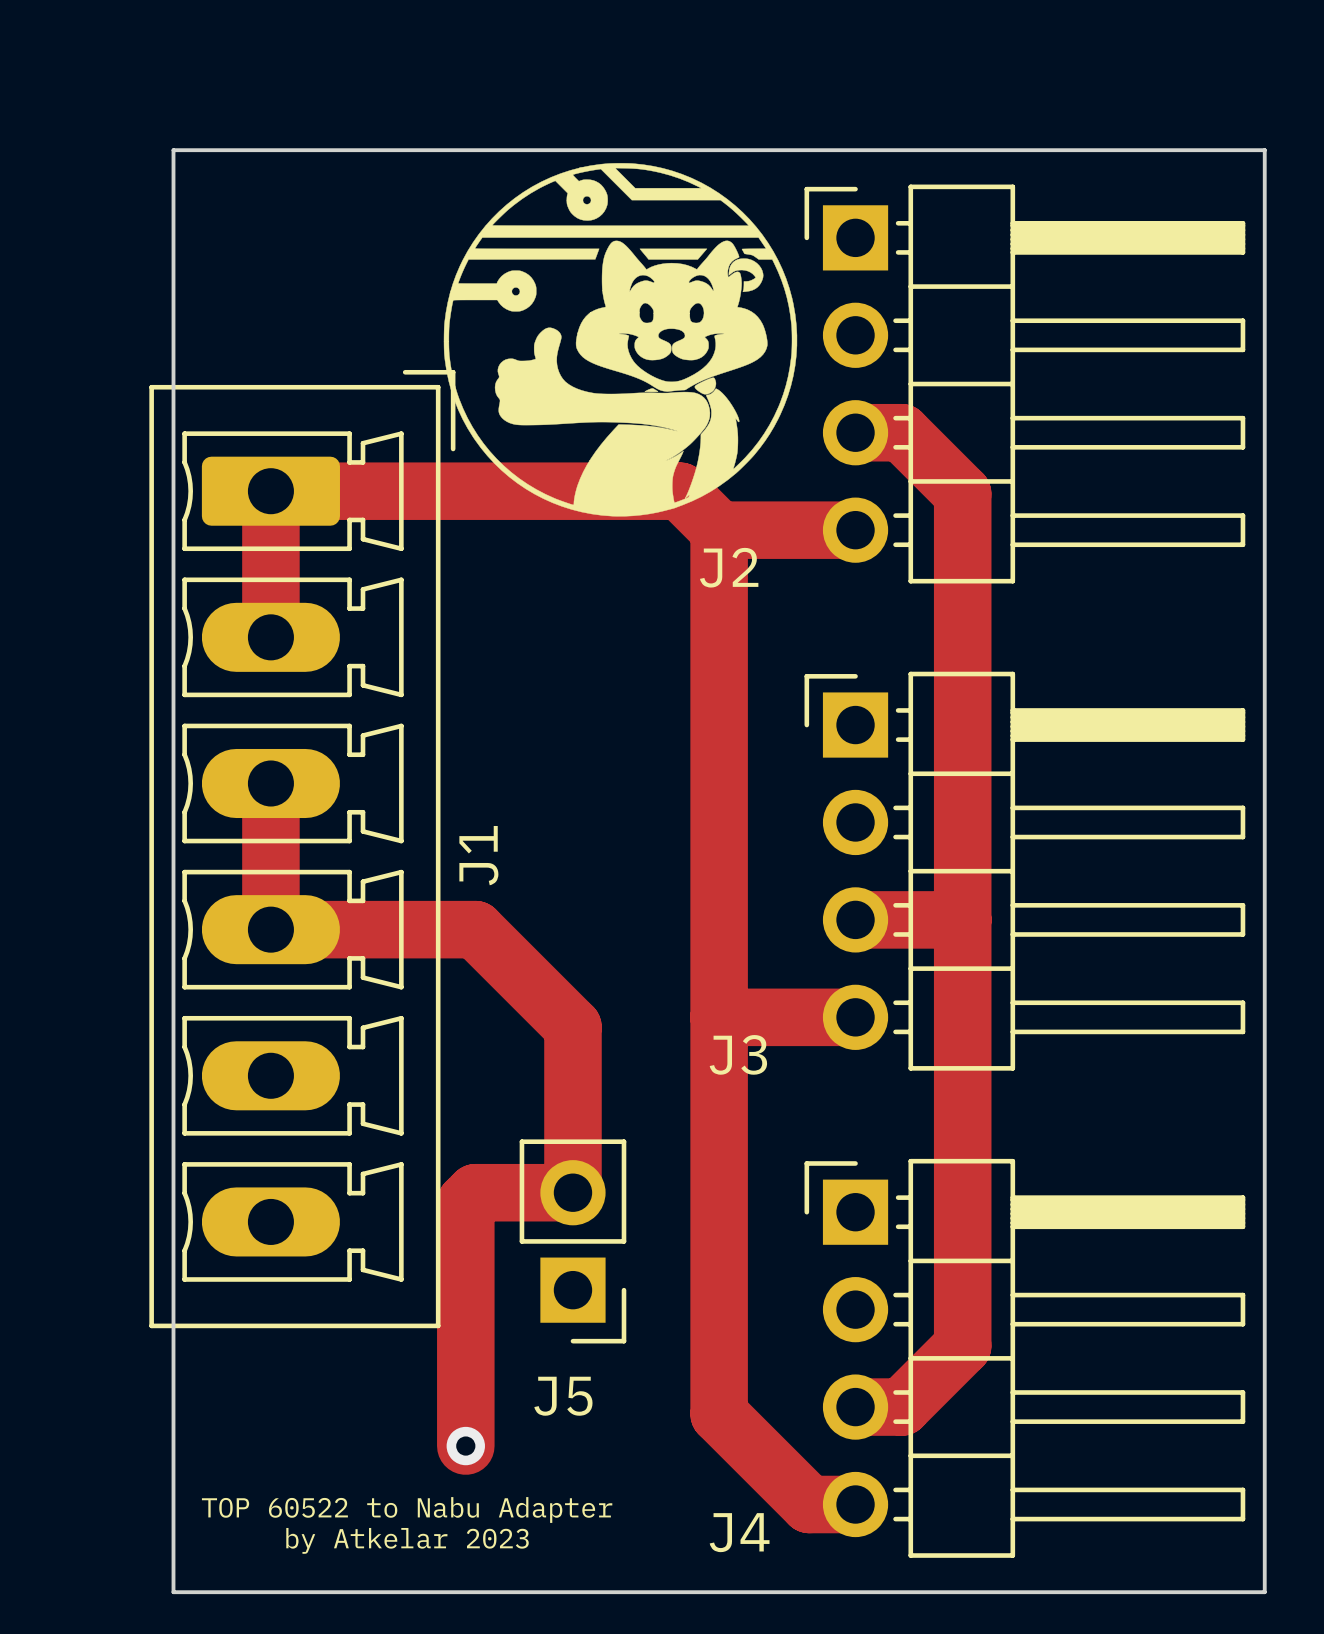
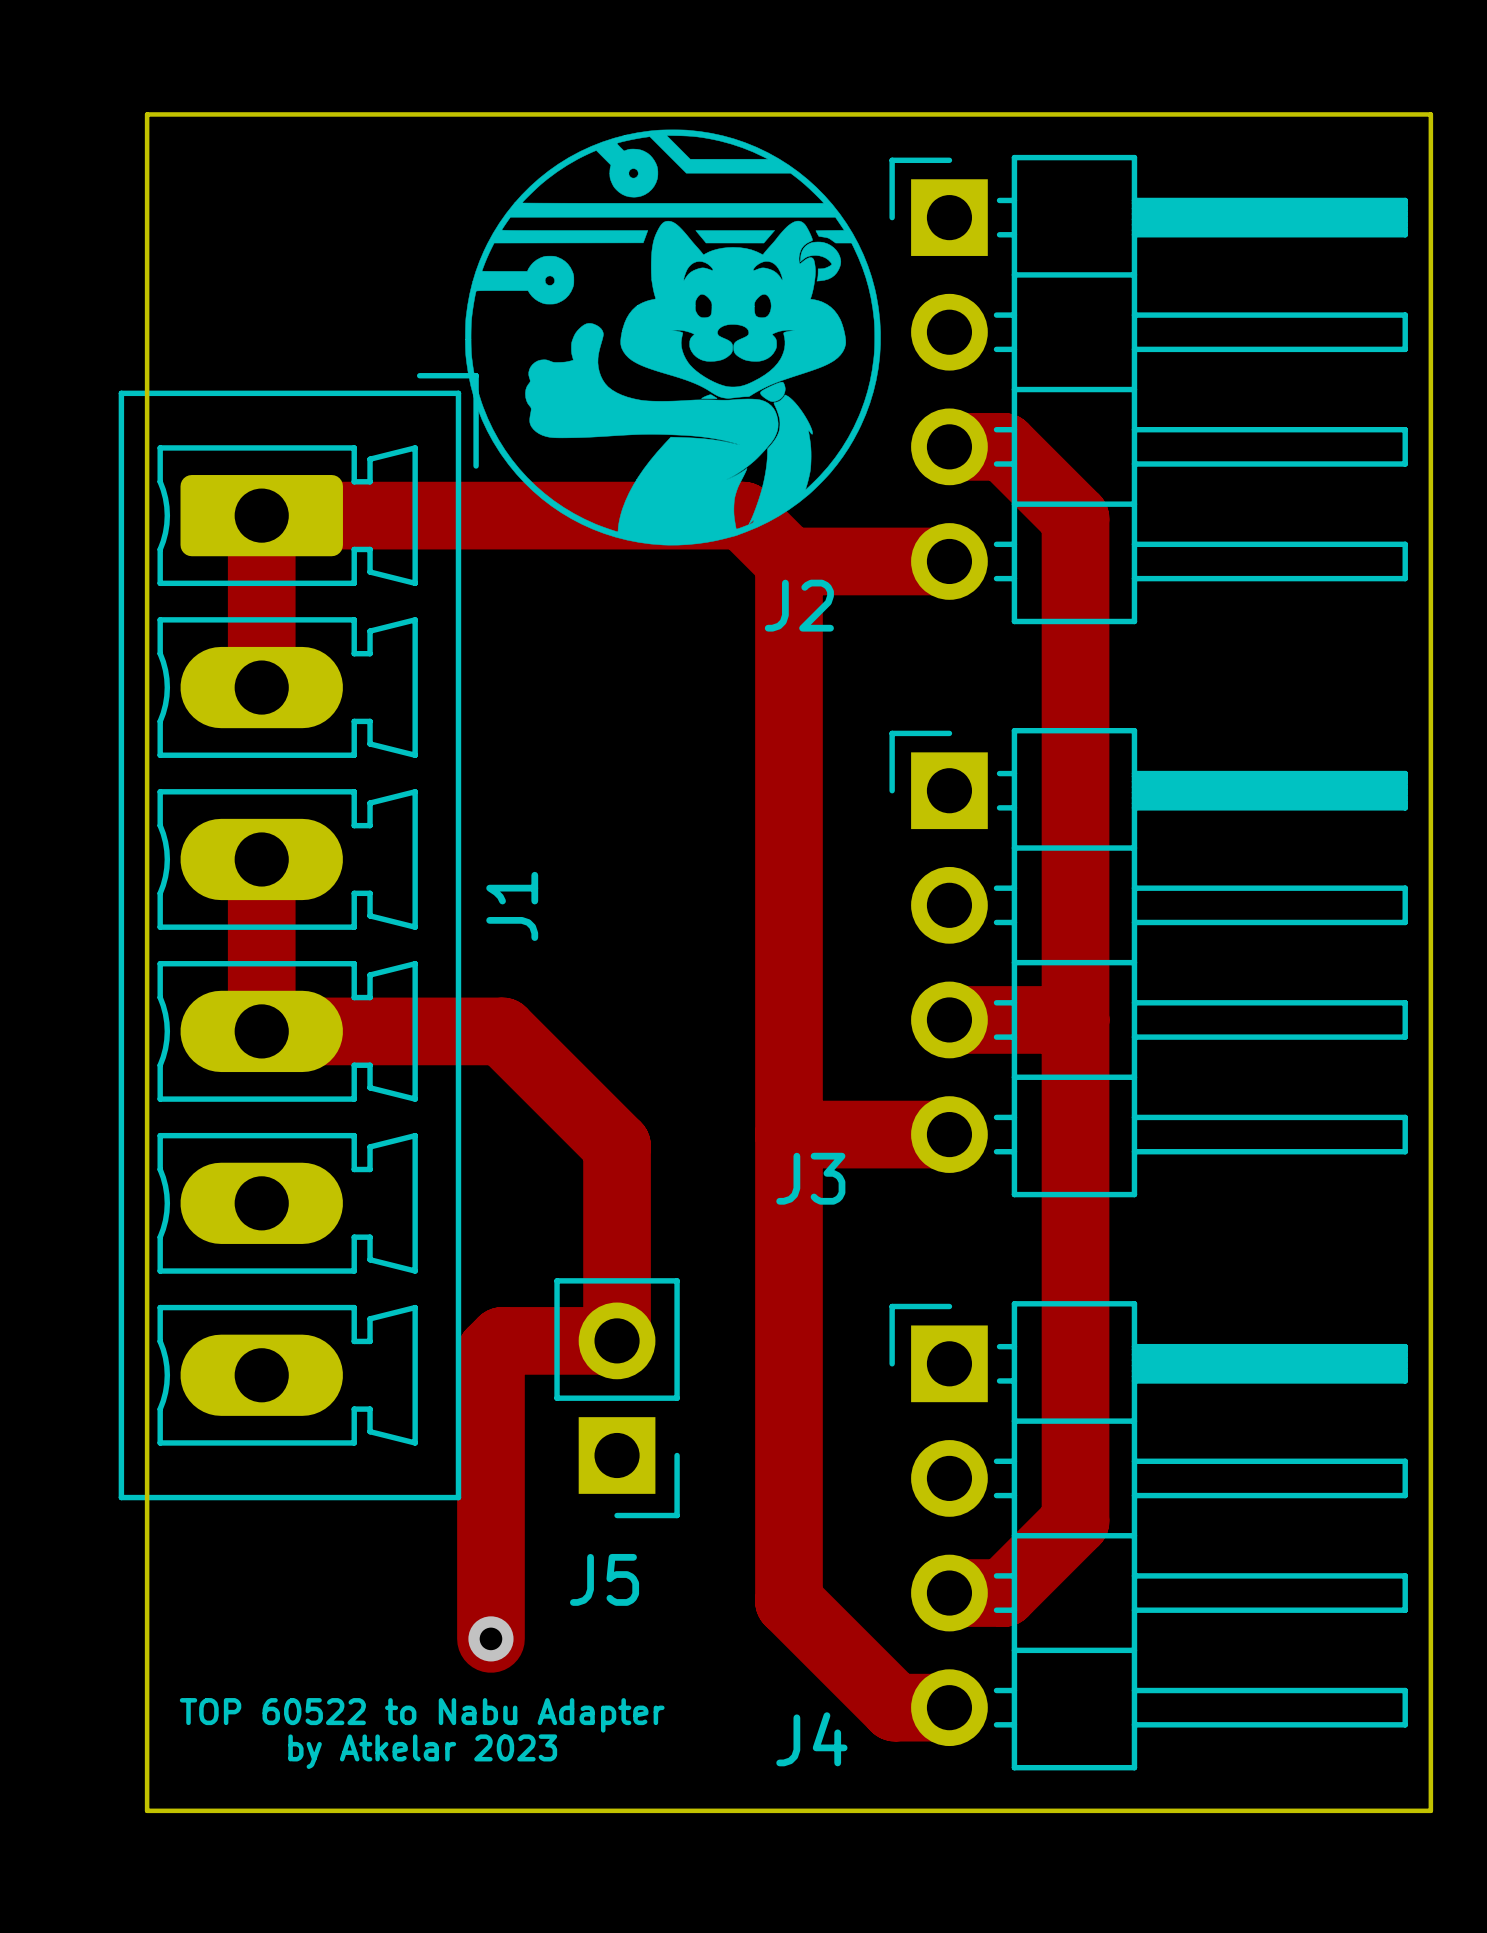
J1 name position: J1 (478, 855) -> J1 (512, 906)

